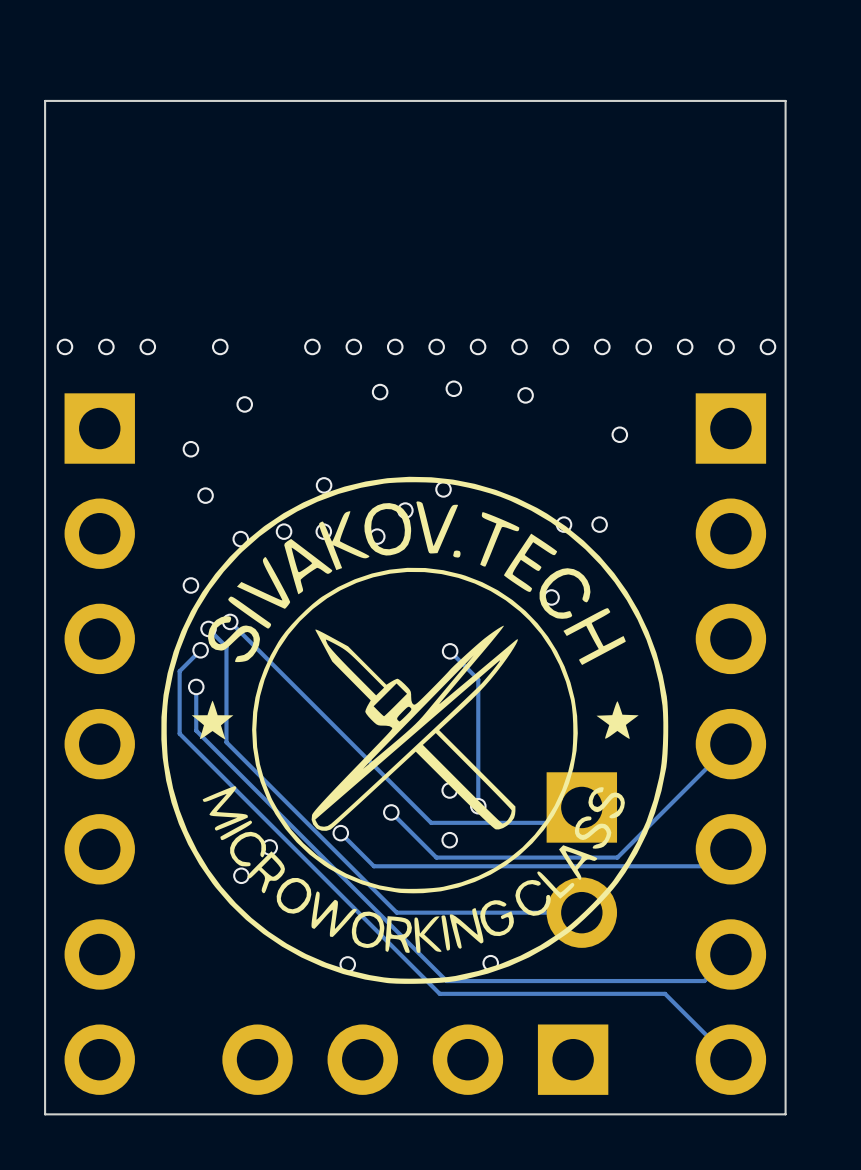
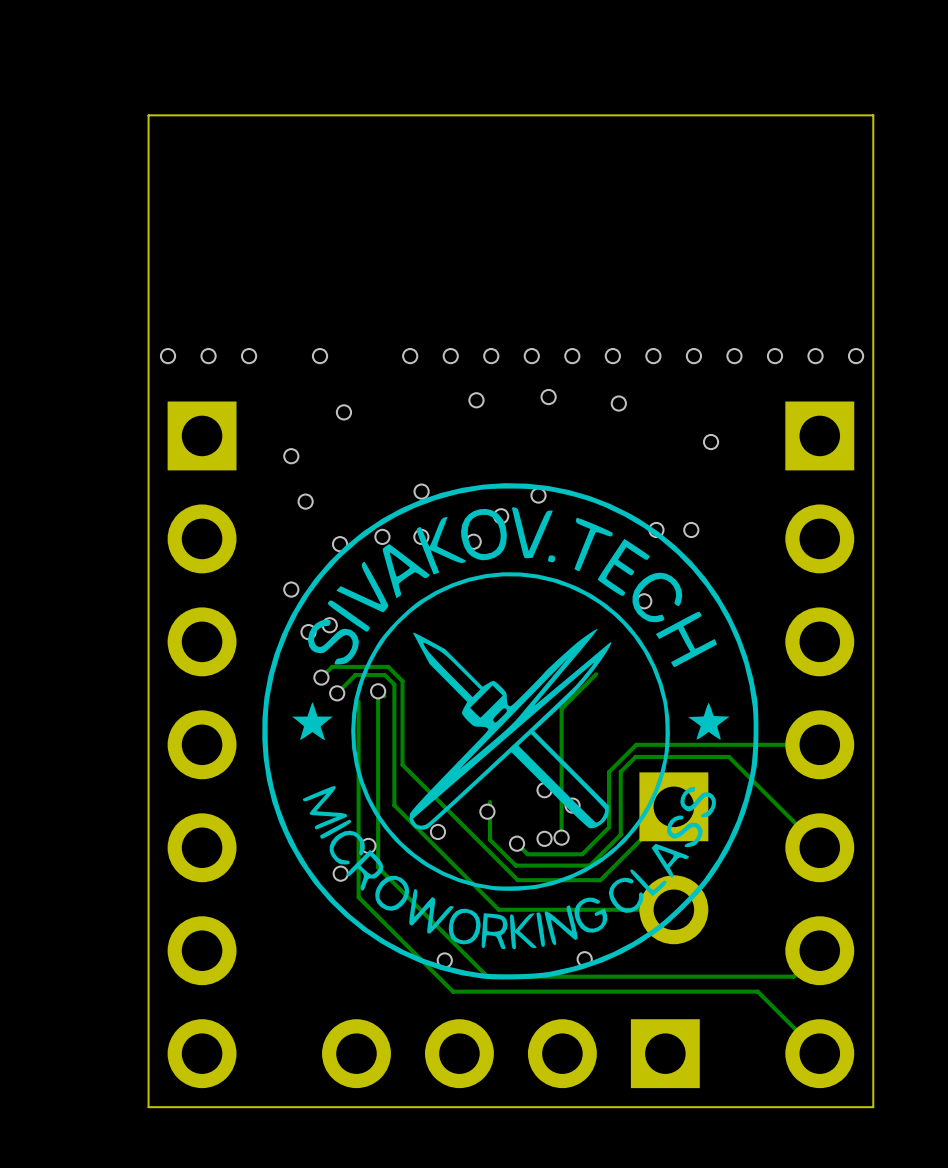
track: (230, 621) (431, 822) (566, 822) -> (321, 677) (332, 666) (388, 666) (402, 681) (402, 764) (517, 880) (600, 880) (658, 821)
track: (208, 628) (226, 646) (226, 742) (396, 912) (402, 912) -> (337, 693) (355, 675) (384, 675) (394, 684) (394, 805) (498, 909)
track: (200, 650) (179, 671) (179, 733) (439, 993) (665, 993) (667, 996) -> (358, 702) (358, 897) (452, 991) (757, 991)
via: (200, 650) -> none
track: (450, 651) (478, 679) (478, 806) -> none
via: (450, 651) -> none
track: none -> (596, 674) (561, 708) (561, 837) (558, 834)
via: none -> (321, 677)
track: (196, 686) (196, 730) (446, 981) -> (378, 691) (378, 867) (487, 976) (541, 976)
via: (196, 686) -> none
via: none -> (378, 691)
via: none -> (337, 693)
track: (730, 744) (617, 857) (436, 857) (391, 812) -> (819, 744) (636, 744) (609, 772) (609, 827) (582, 854) (527, 854) (517, 843)
track: (340, 833) (373, 866) (713, 866) (730, 849) -> (489, 801) (489, 839) (515, 865) (589, 865) (620, 834) (620, 771) (635, 756) (728, 756) (819, 847)
via: none -> (561, 837)
via: none -> (517, 843)

